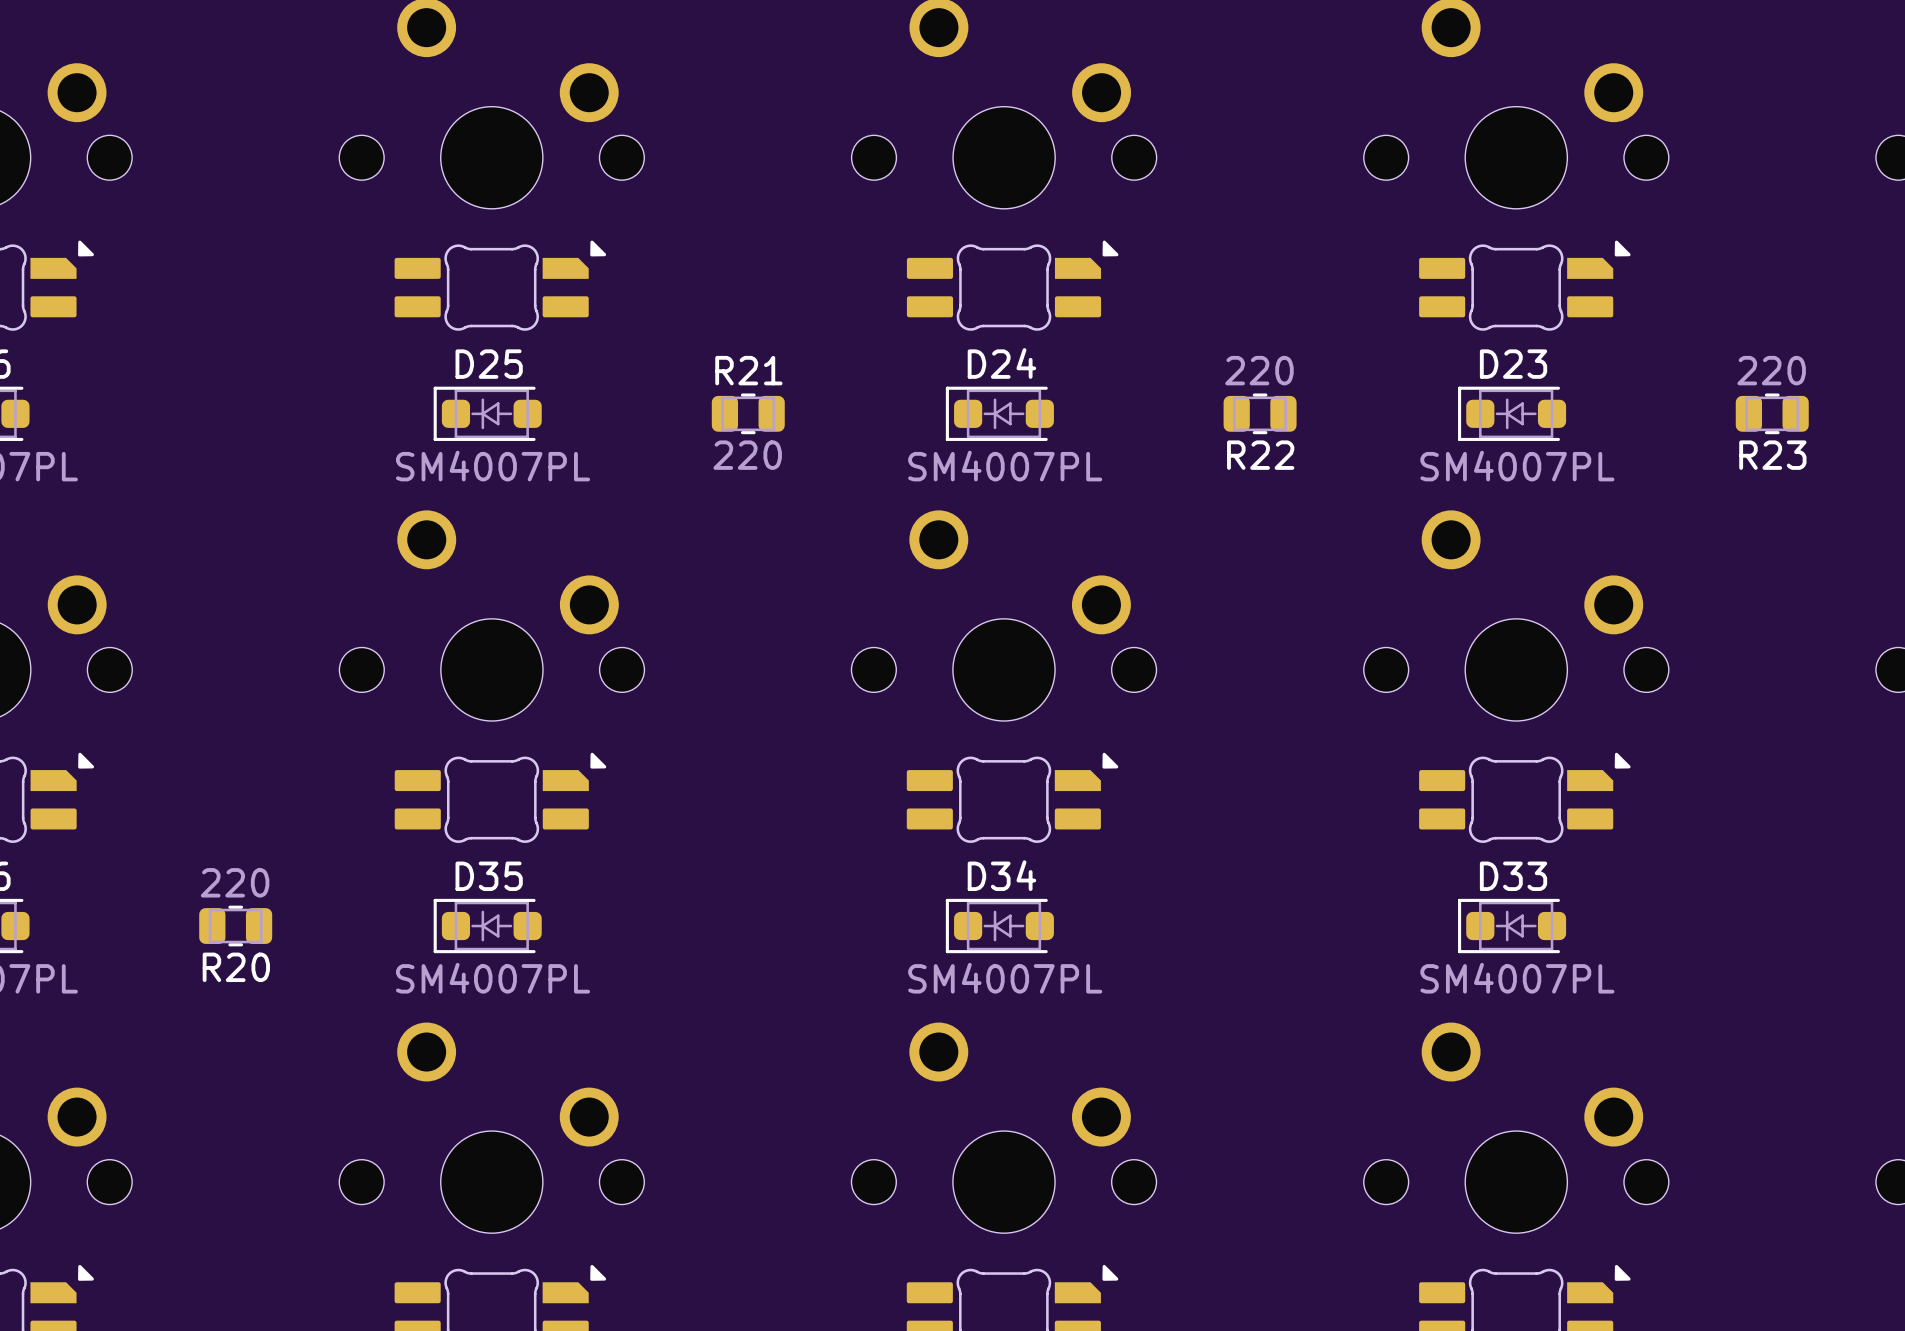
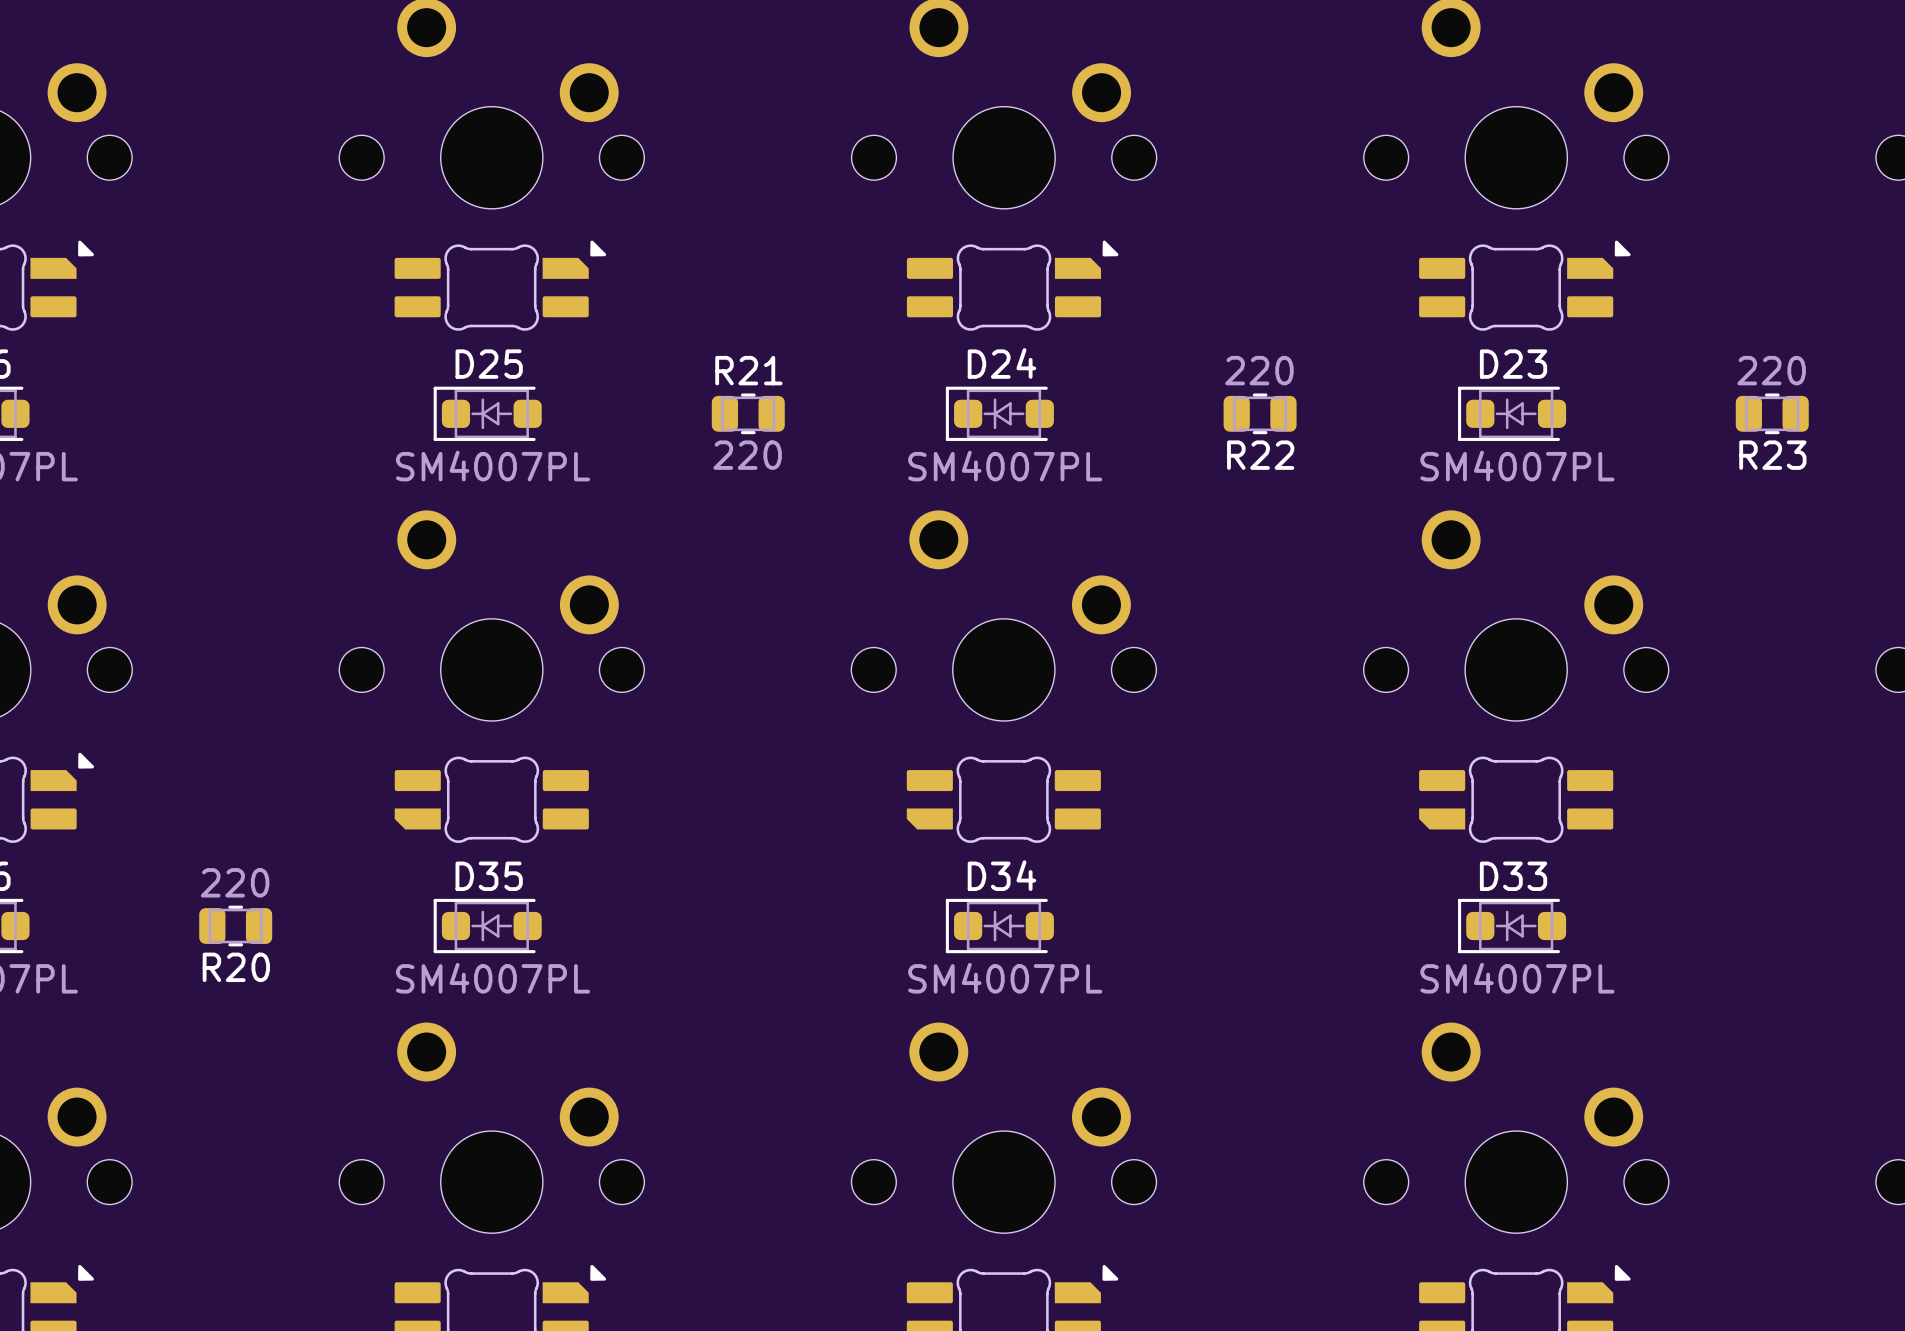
part footprint: [339, 510, 645, 843] -> [339, 510, 645, 843]
part footprint: [851, 510, 1157, 843] -> [851, 510, 1157, 843]
part footprint: [1363, 510, 1669, 843] -> [1363, 510, 1669, 843]

